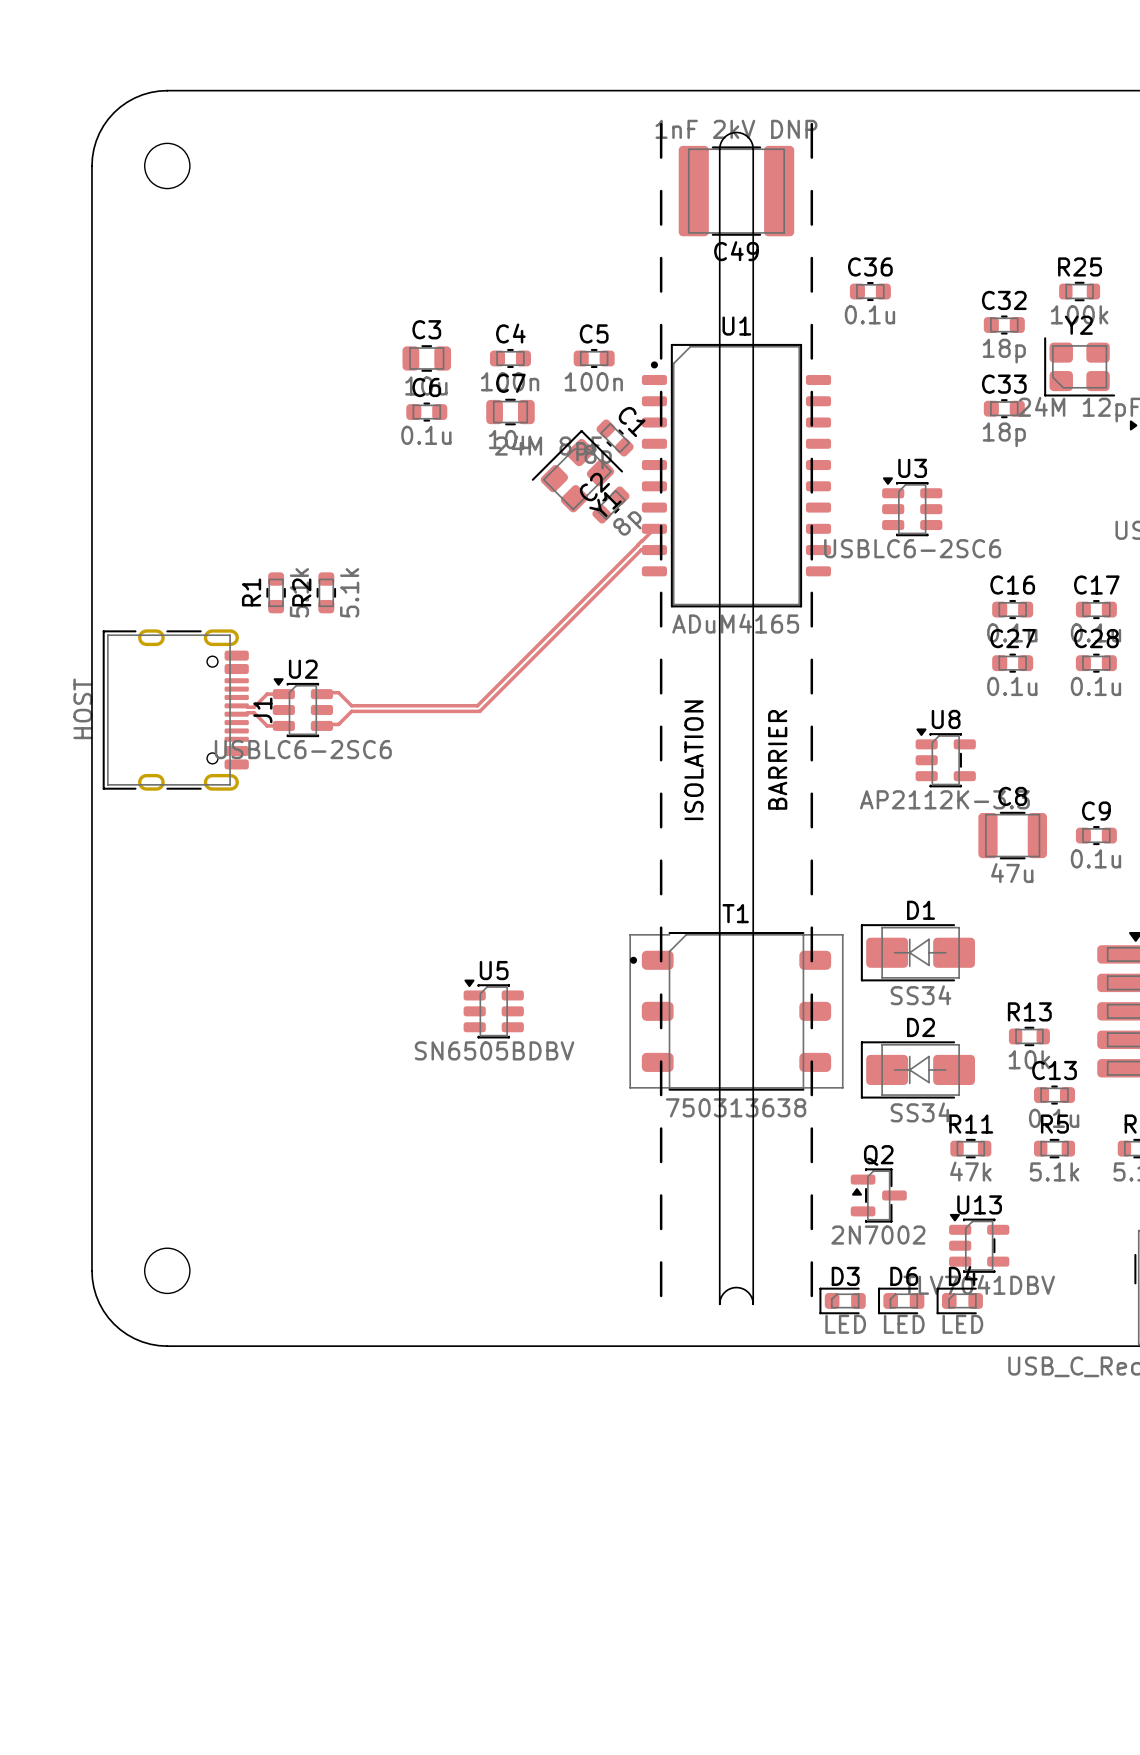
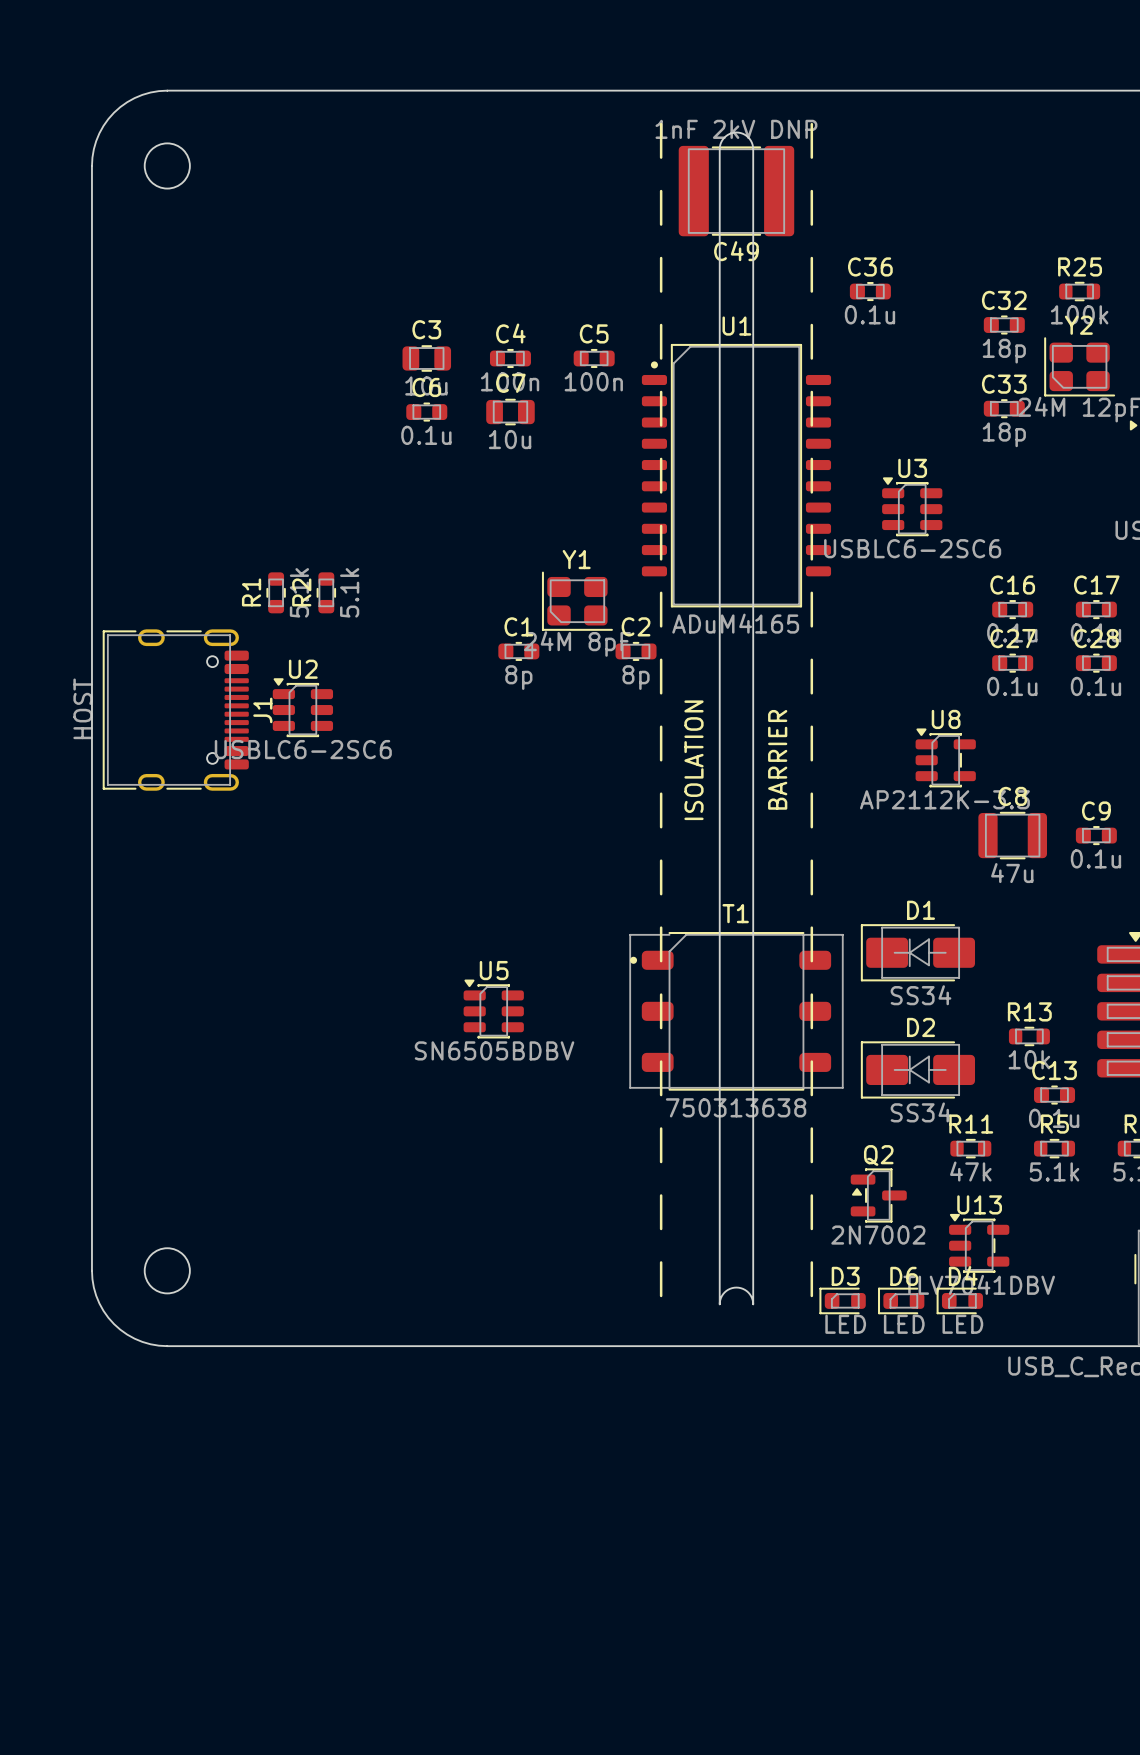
C1 rotation: 0° (615, 438) -> 45° counterclockwise (518, 651)
C1 position: (615, 438) -> (518, 651)
Y1 rotation: 0° (577, 471) -> 135° counterclockwise (577, 601)
Y1 position: (577, 471) -> (577, 601)
C2 rotation: 0° (610, 504) -> 45° clockwise (636, 651)
C2 position: (610, 504) -> (636, 651)
top track: (654, 528) (477, 705) (351, 705) (338, 692) (321, 694) -> none
top track: (654, 550) (641, 550) (479, 711) (351, 711) (338, 724) (321, 725) -> none
top track: (283, 694) (267, 694) (254, 707) (236, 705) -> none
top track: (236, 714) (254, 712) (267, 725) (283, 725) -> none

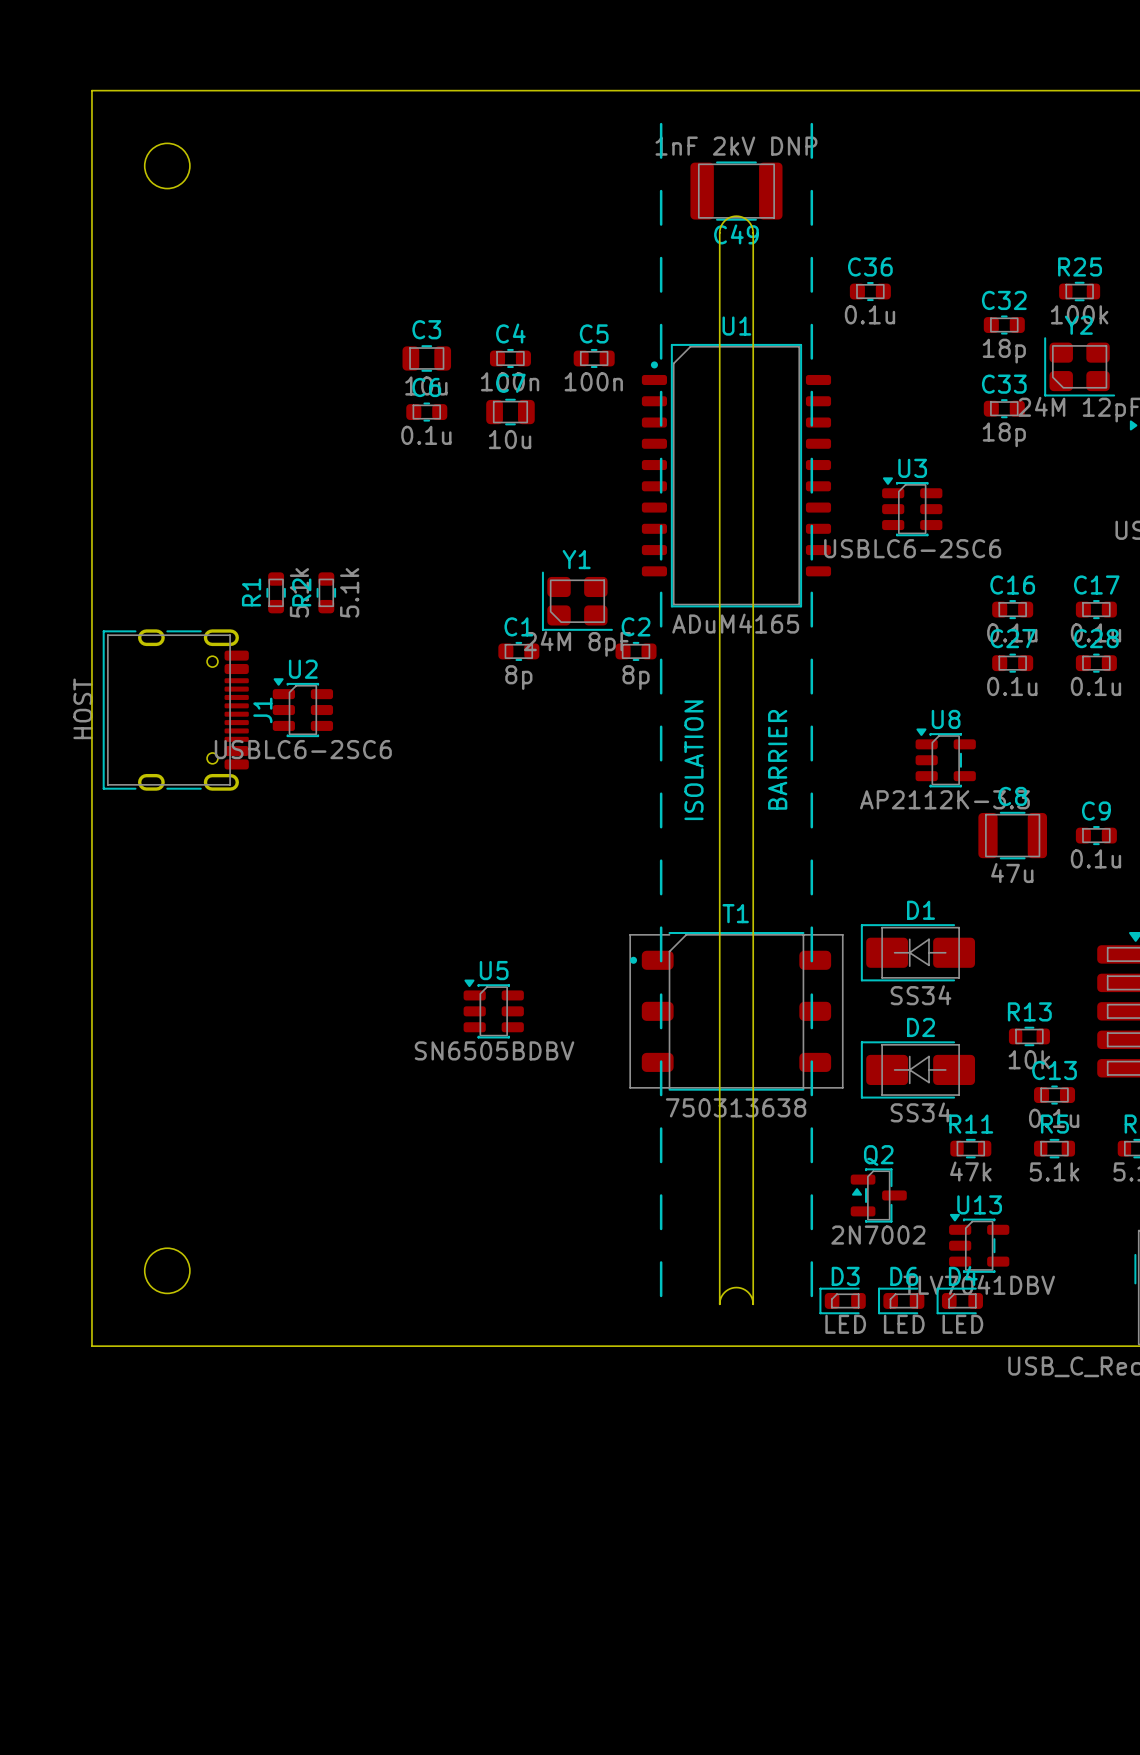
board edge: (167, 90) (142, 94) (127, 102) (114, 112) (99, 133) (93, 149) (91, 165) -> (167, 90) (91, 90) (91, 165)
C49 footprint: [678, 145, 795, 237] -> [690, 161, 783, 221]
board edge: (719, 232) (719, 147) (724, 137) (736, 132) (748, 137) (753, 147) (753, 232) -> (719, 232) (724, 221) (736, 216) (748, 221) (753, 232)
board edge: (91, 1270) (96, 1295) (103, 1310) (114, 1324) (134, 1338) (150, 1344) (167, 1346) -> (91, 1270) (91, 1346) (167, 1346)

